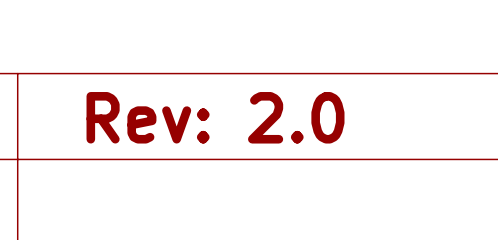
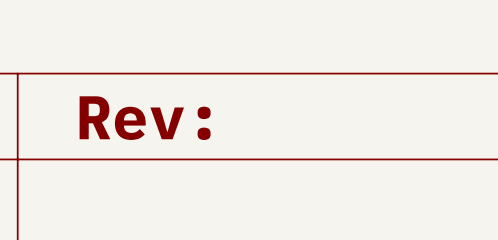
title block: Rev: 2.0 (215, 117) -> Rev: (145, 118)

